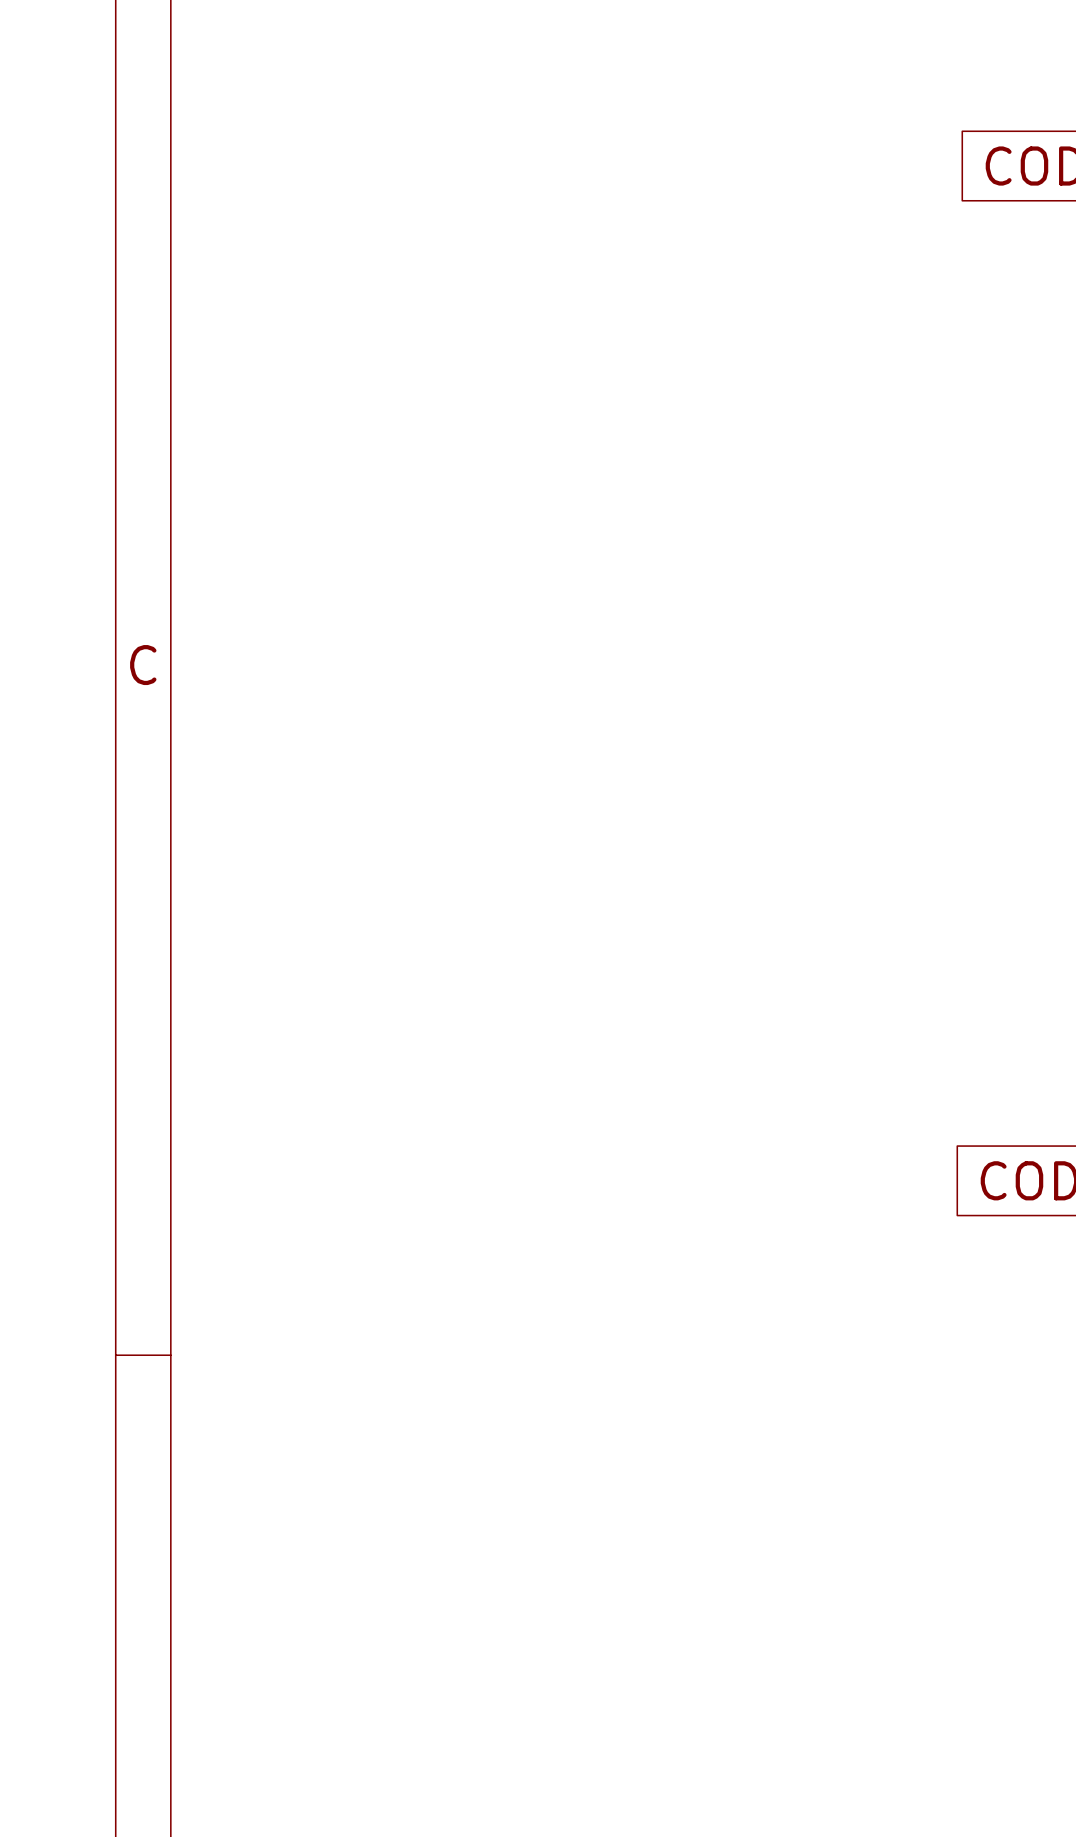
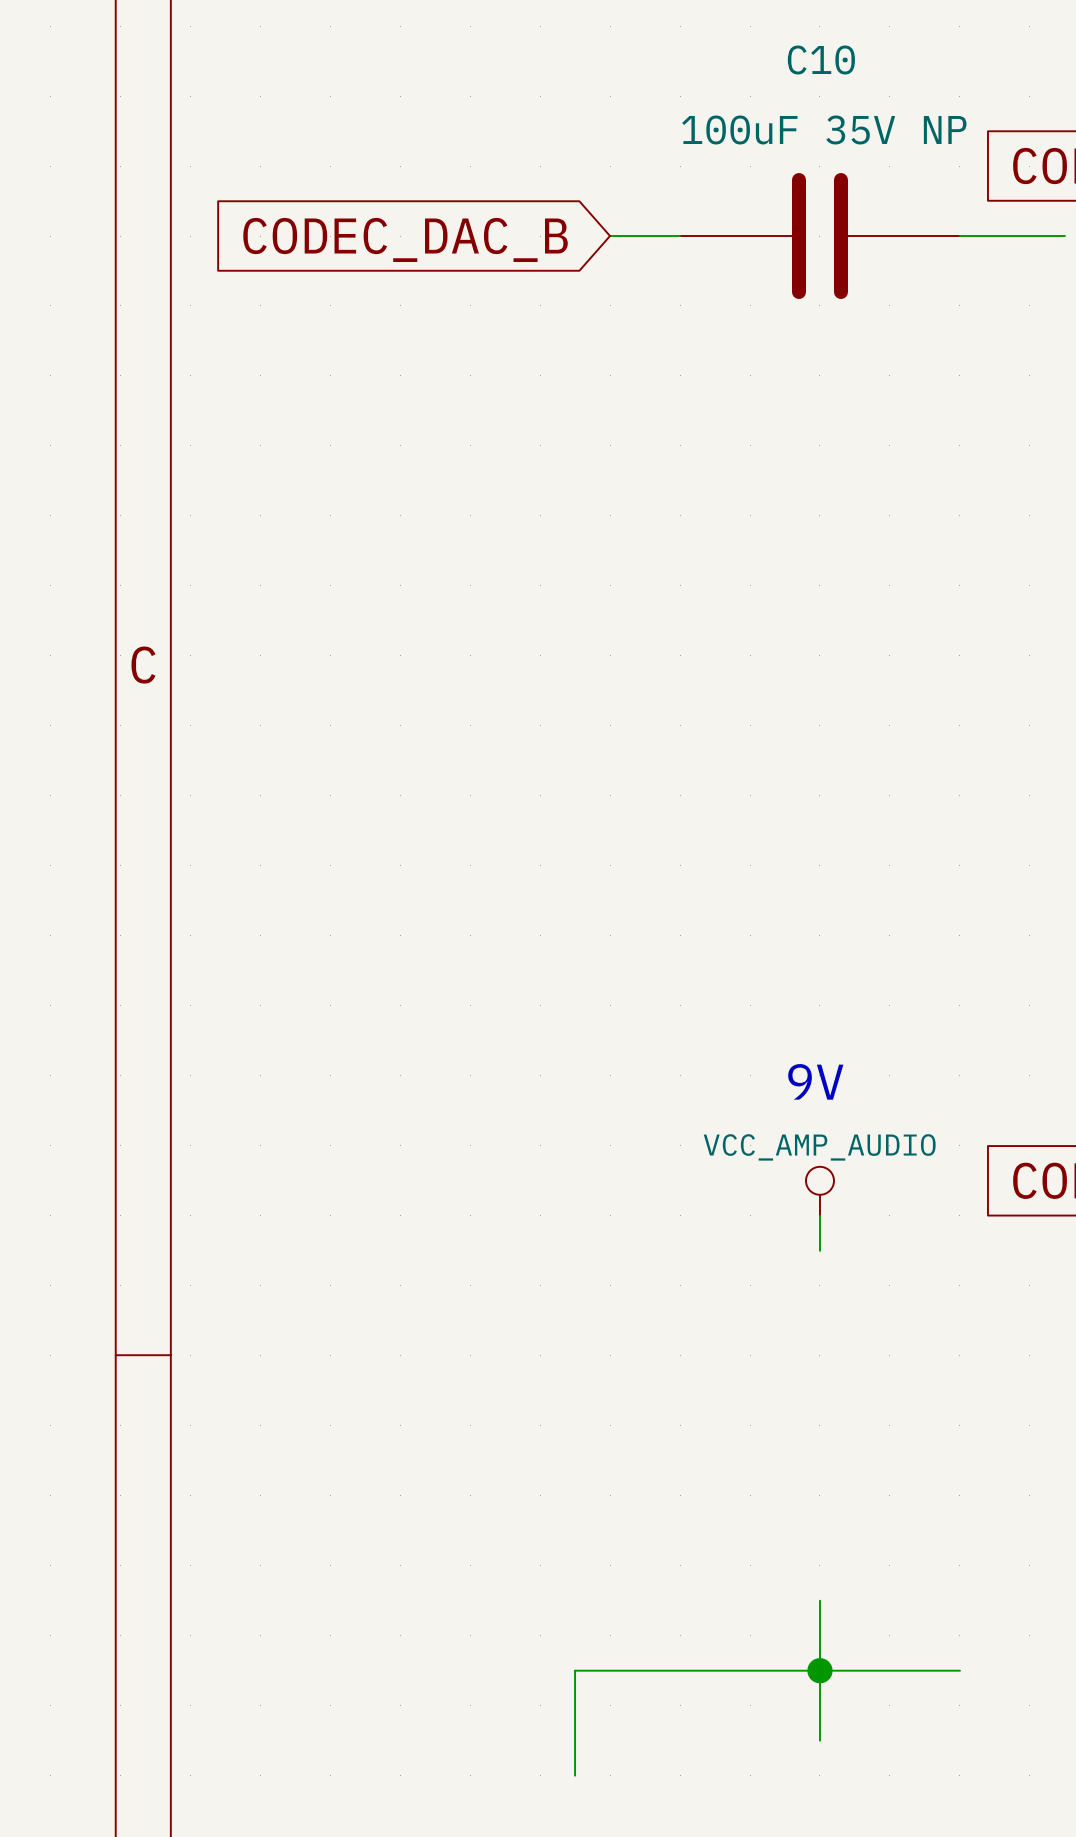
wire: none -> (610, 236) (680, 236)
C10: none -> 100uF 35V NP (819, 236)
wire: none -> (959, 236) (1064, 236)
global label: none -> CODEC_DAC_B (405, 239)
text: none -> 9V (815, 1081)
power symbol: none -> VCC_AMP_AUDIO (819, 1191)
wire: none -> (819, 1215) (819, 1250)
wire: none -> (819, 1600) (819, 1740)
junction: none -> (819, 1670)
wire: none -> (959, 1670) (575, 1670) (575, 1775)

